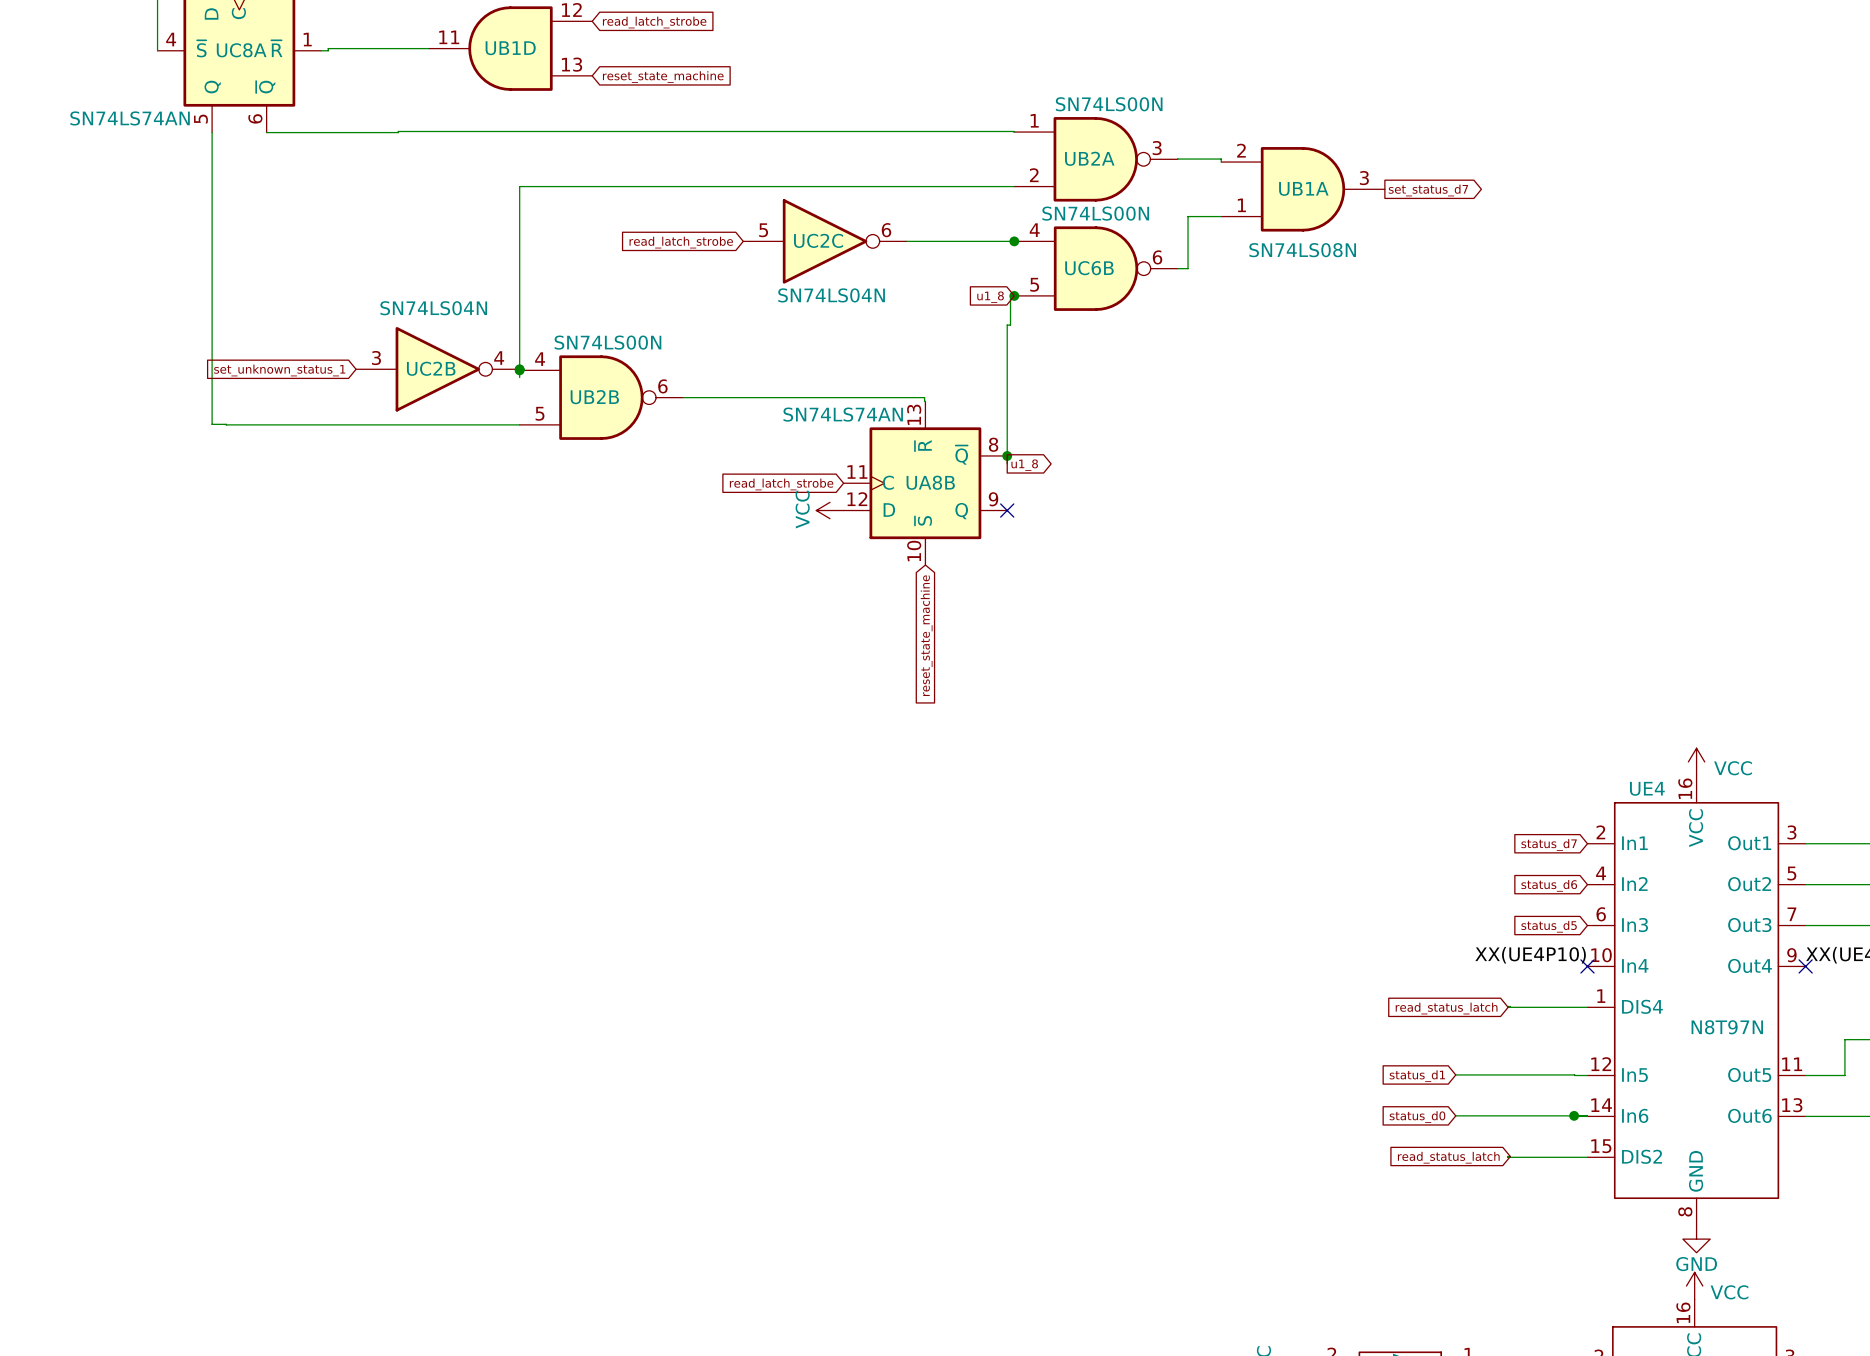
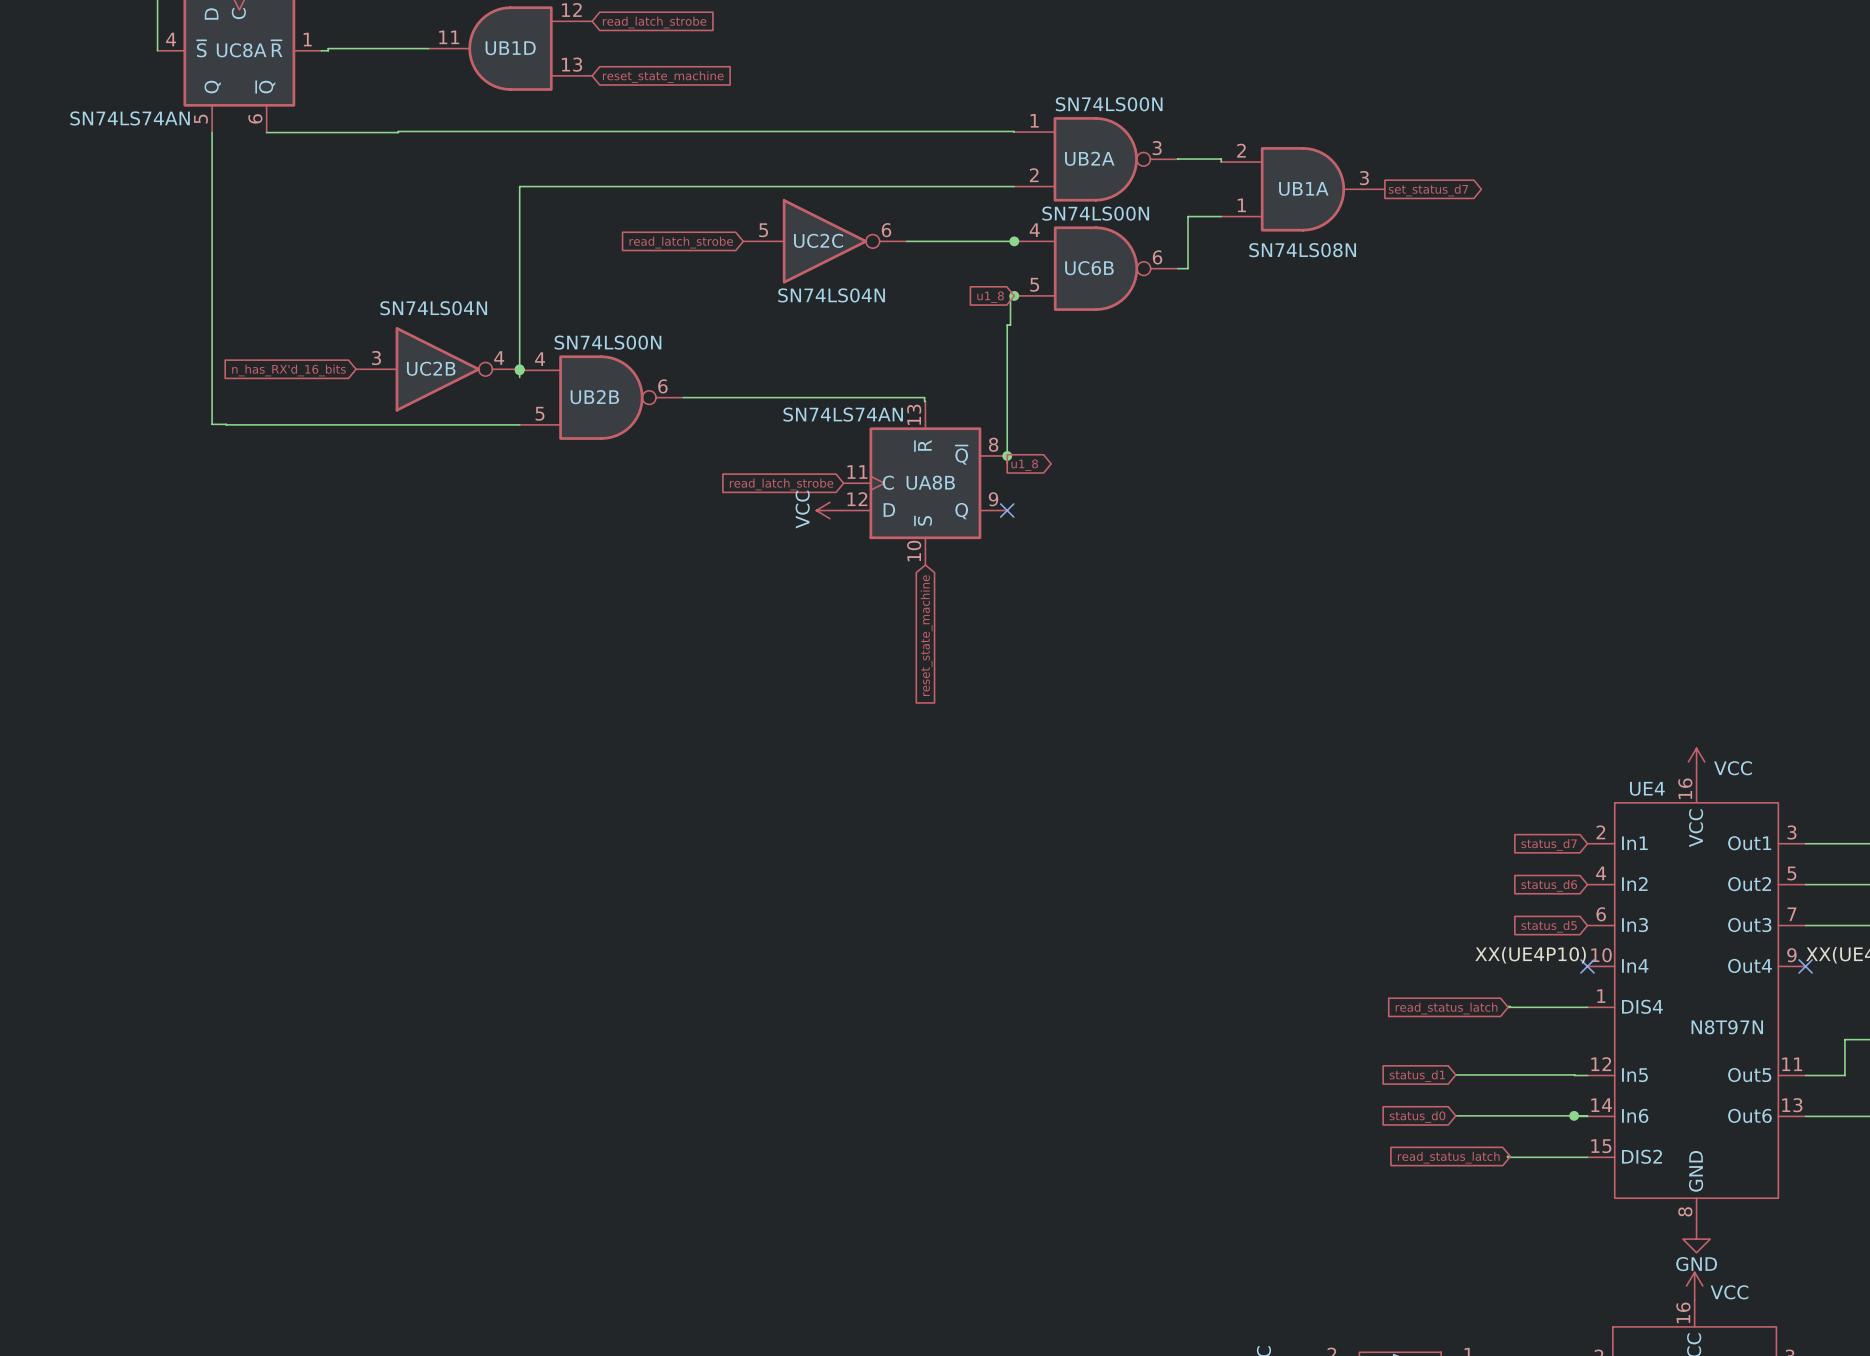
global label: set_unknown_status_1 (279, 370) -> n_has_RX'd_16_bits (288, 370)

